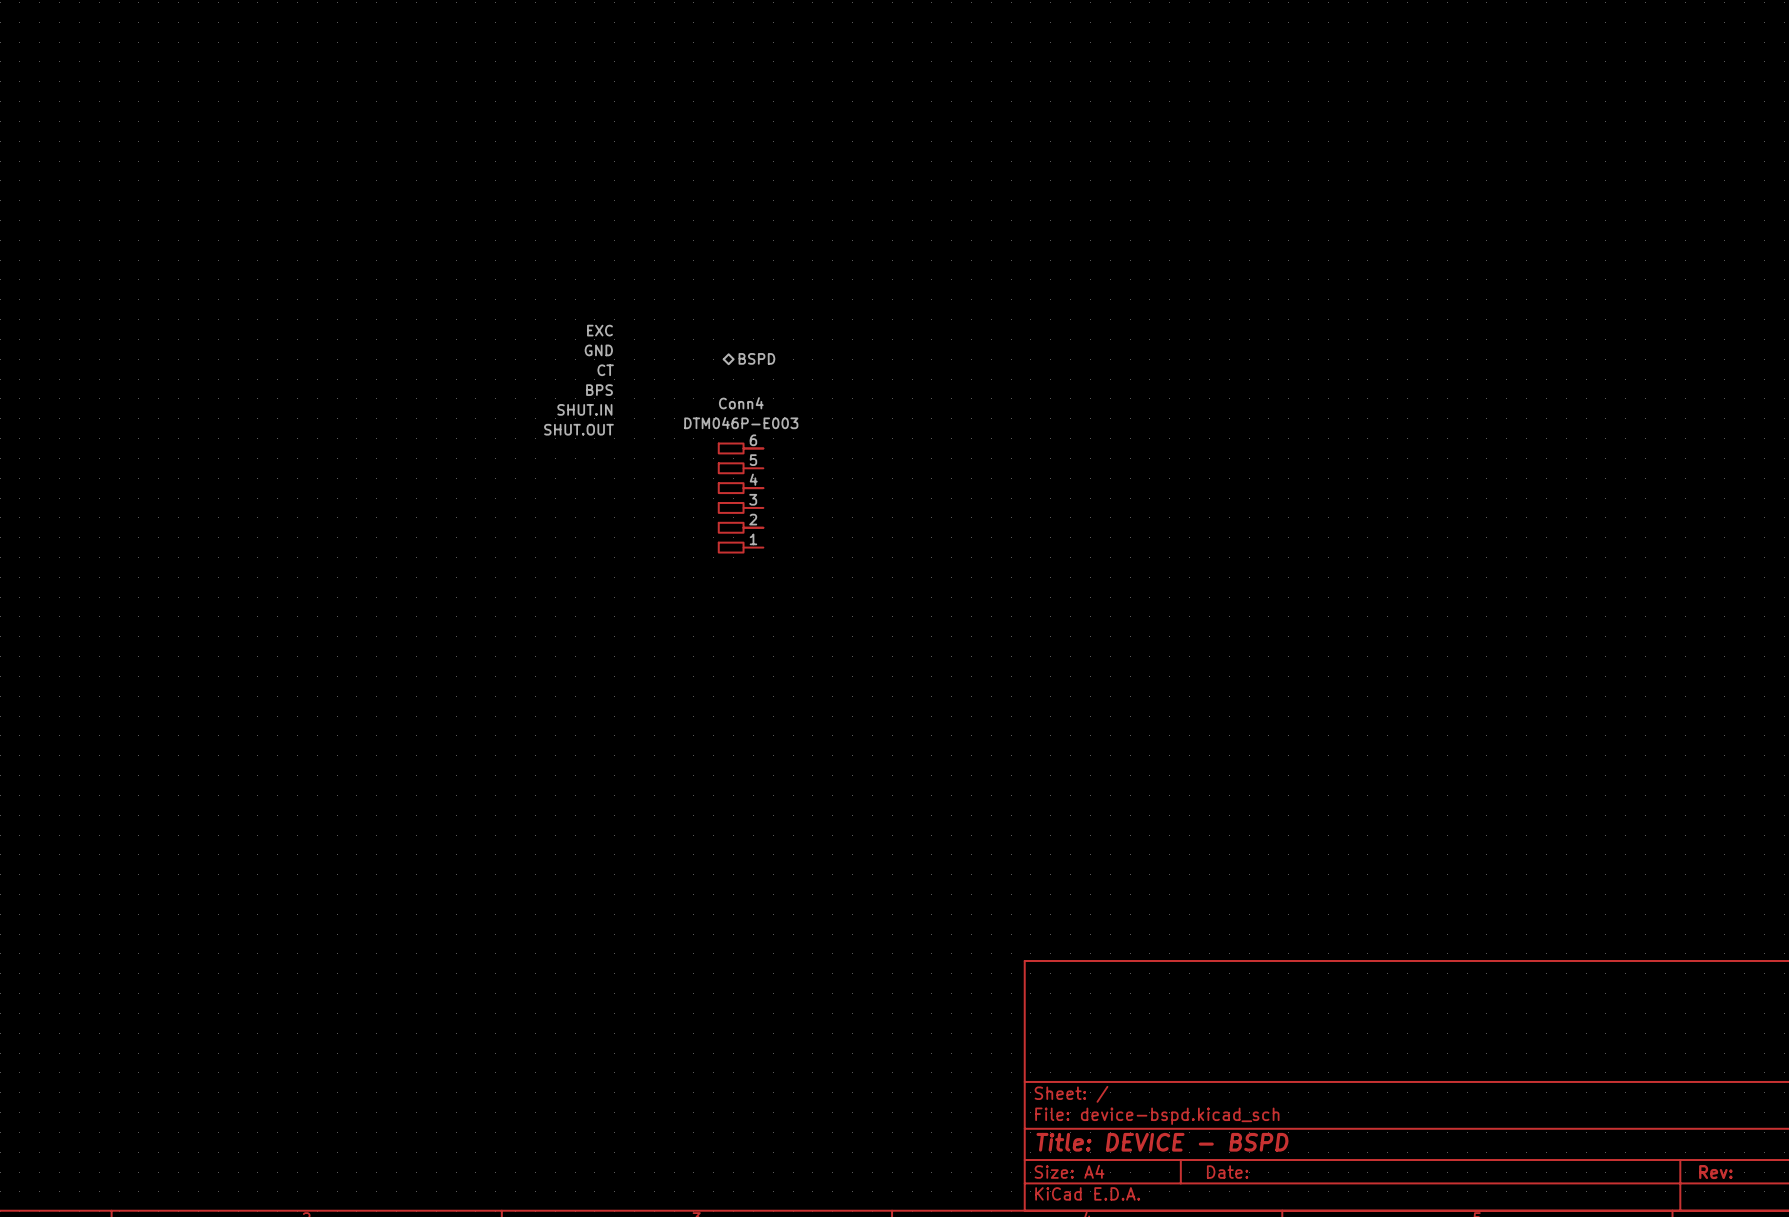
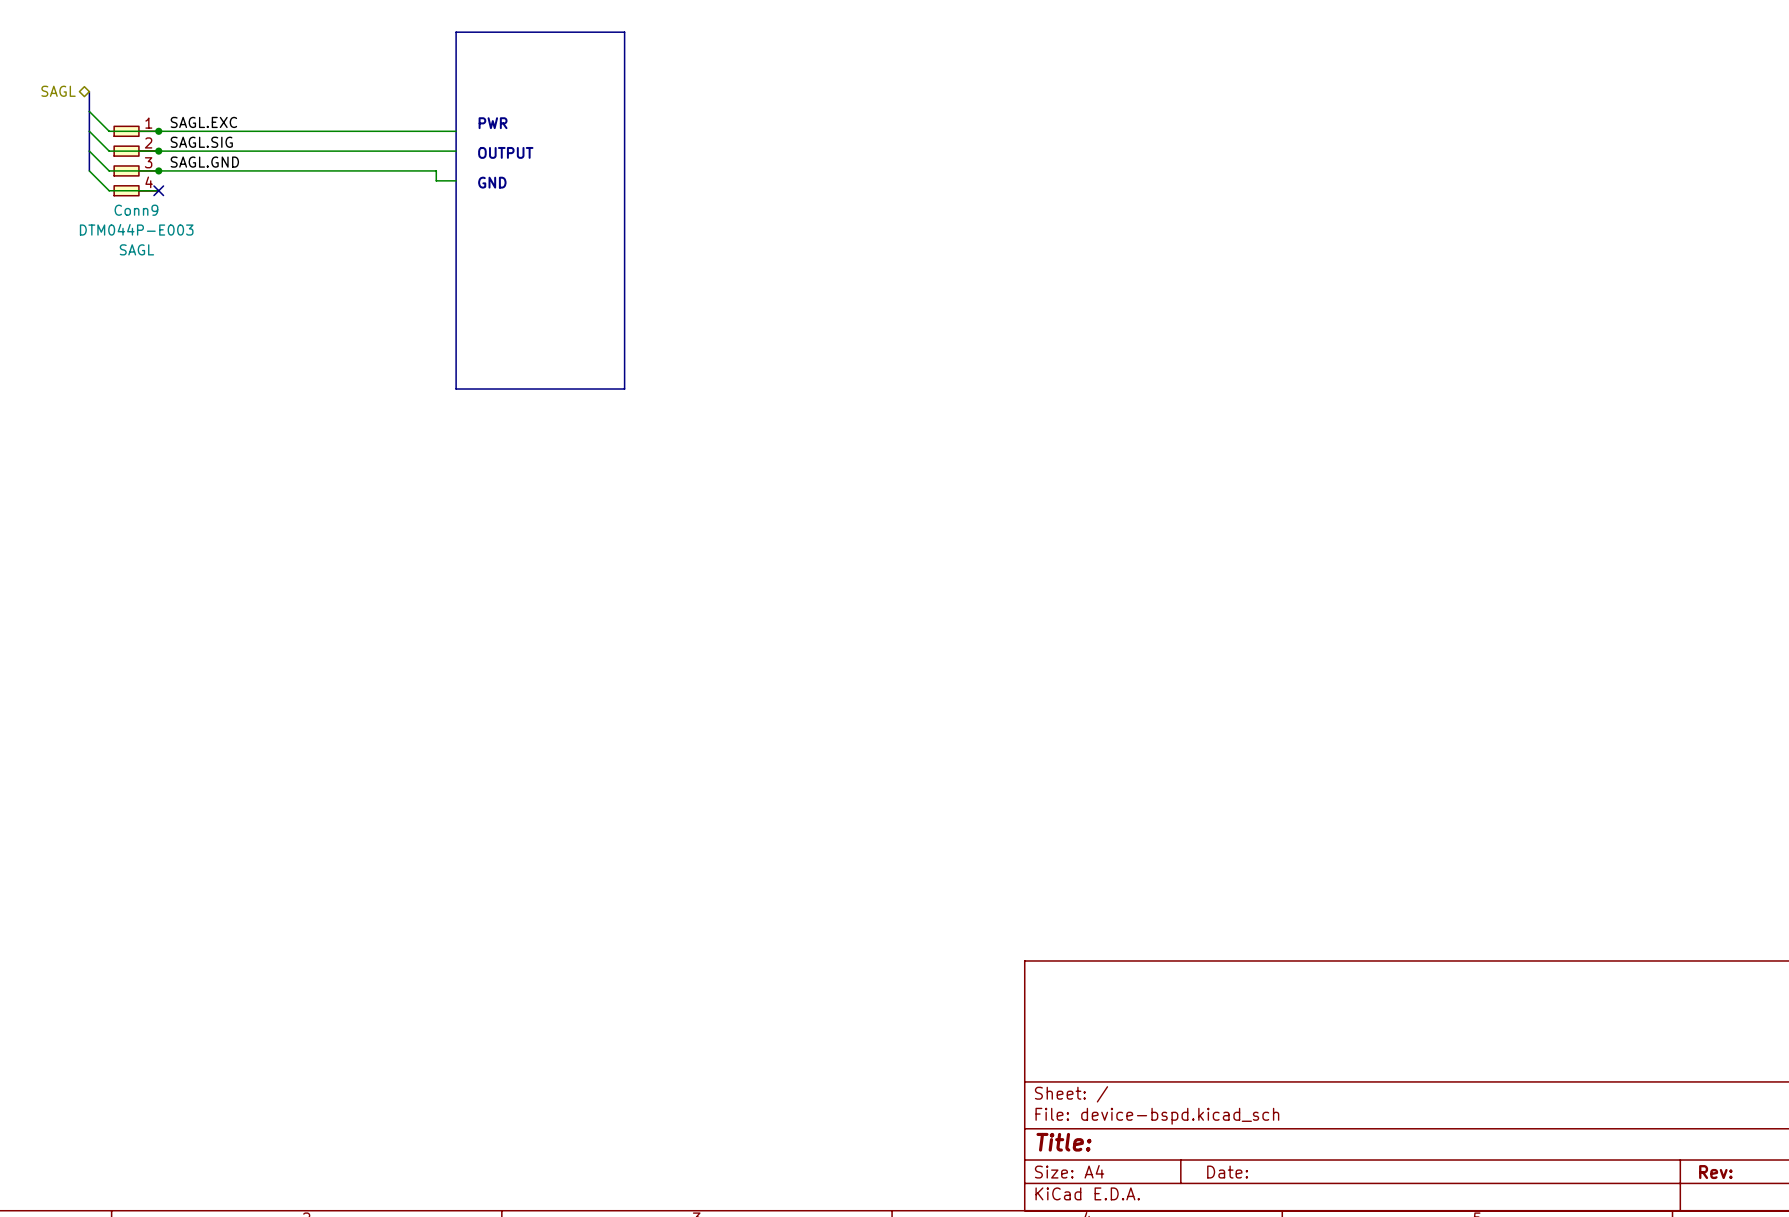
line: none -> (456, 32) (624, 32) (624, 389) (456, 389) (456, 32)
hierarchical label: none -> SAGL (58, 91)
bus: none -> (89, 91) (89, 170)
wire: none -> (89, 111) (109, 131) (456, 131)
label: none -> SAGL.EXC (203, 122)
text: none -> PWR (493, 123)
wire: none -> (89, 131) (109, 151) (456, 151)
junction: none -> (158, 131)
label: none -> SAGL.SIG (201, 142)
wire: none -> (89, 151) (109, 170) (436, 170) (436, 180) (456, 180)
junction: none -> (158, 151)
text: none -> OUTPUT (505, 152)
Conn9: none -> (136, 161)
label: none -> SAGL.GND (204, 162)
wire: none -> (89, 170) (109, 190) (158, 190)
junction: none -> (158, 170)
text: none -> GND (492, 182)
no-connect mark: none -> (158, 190)
label: EXC (599, 330) -> none
label: GND (598, 350) -> none
hierarchical label: BSPD (756, 358) -> none
label: CT (605, 370) -> none
label: BPS (599, 390) -> none
label: SHUT.IN (584, 409) -> none
label: SHUT.OUT (578, 429) -> none
Conn4: (741, 498) -> none
title block: Title: DEVICE - BSPD (1162, 1142) -> Title: (1064, 1142)

